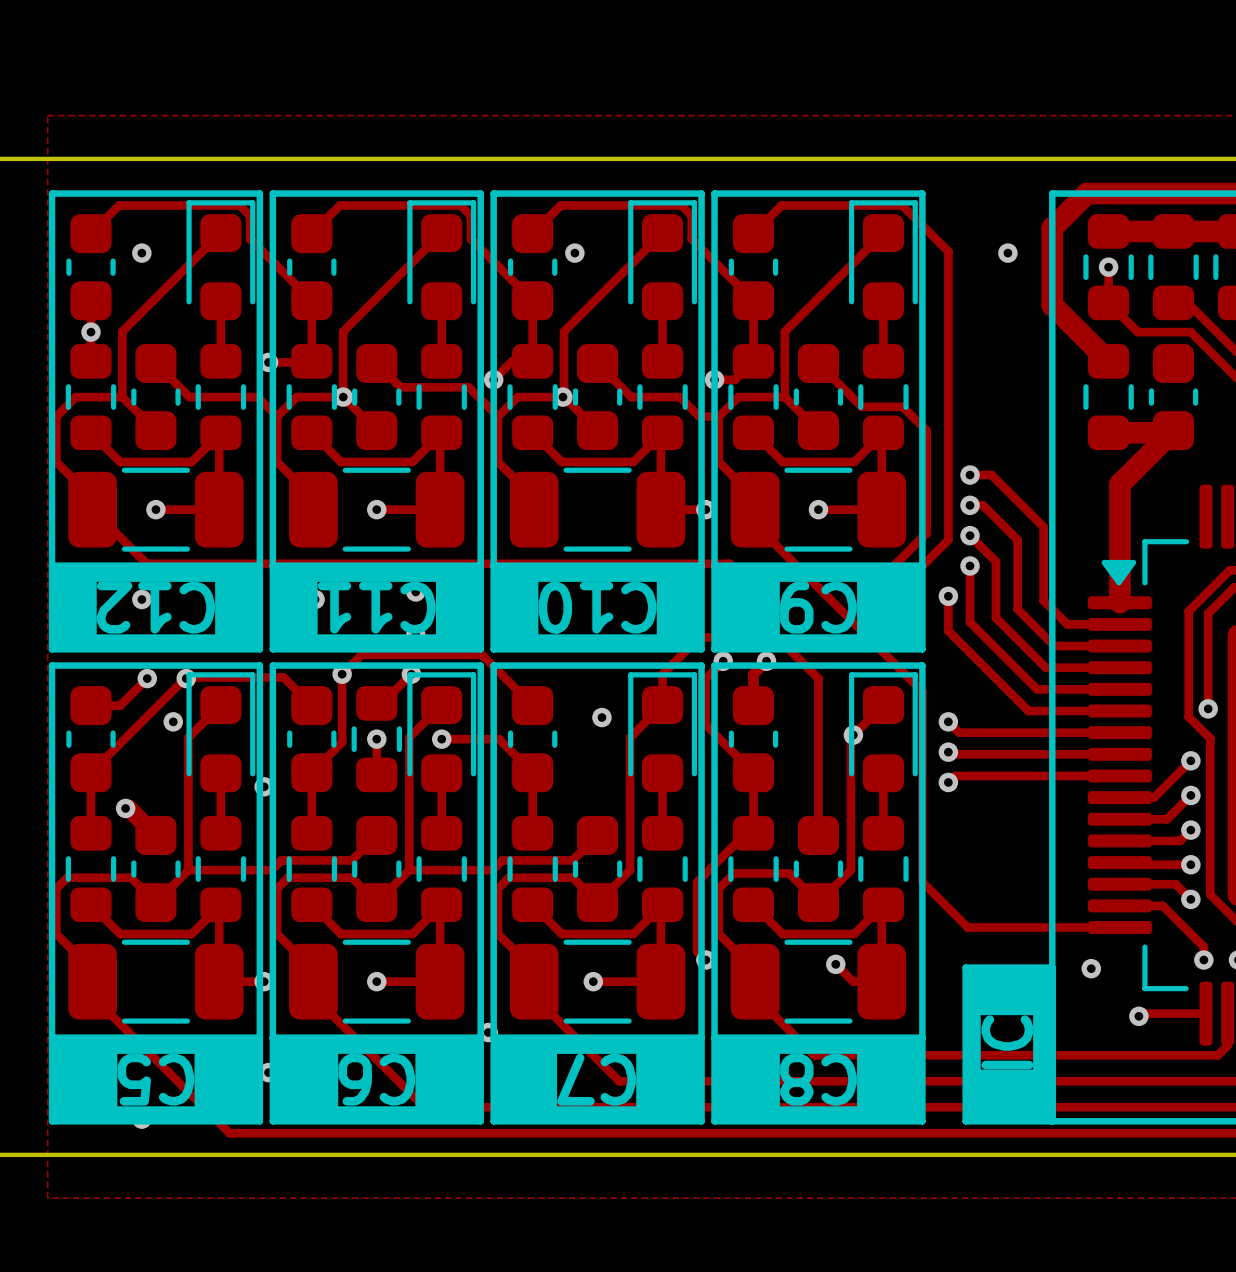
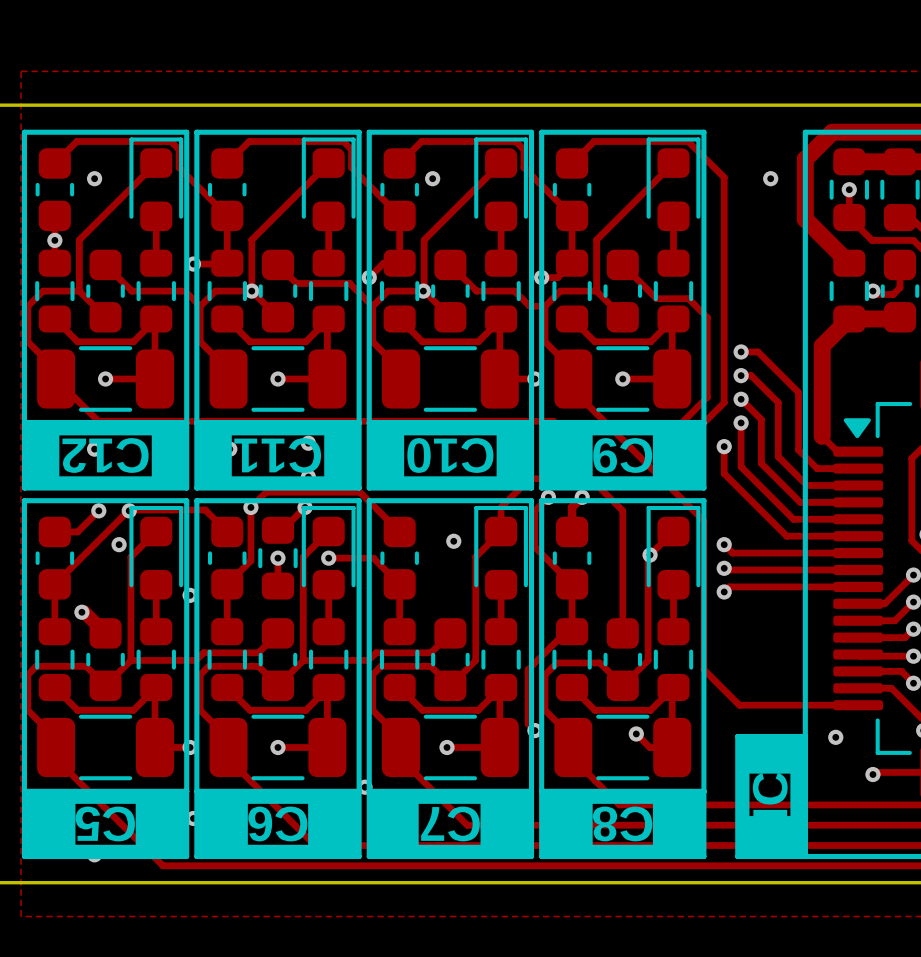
track: none -> (900, 264) (900, 287) (893, 294) (876, 294) (872, 291)
via: none -> (872, 291)
track: (1171, 432) (1119, 484) (1119, 602) -> (850, 317) (822, 346) (822, 436) (837, 451) (858, 451)

